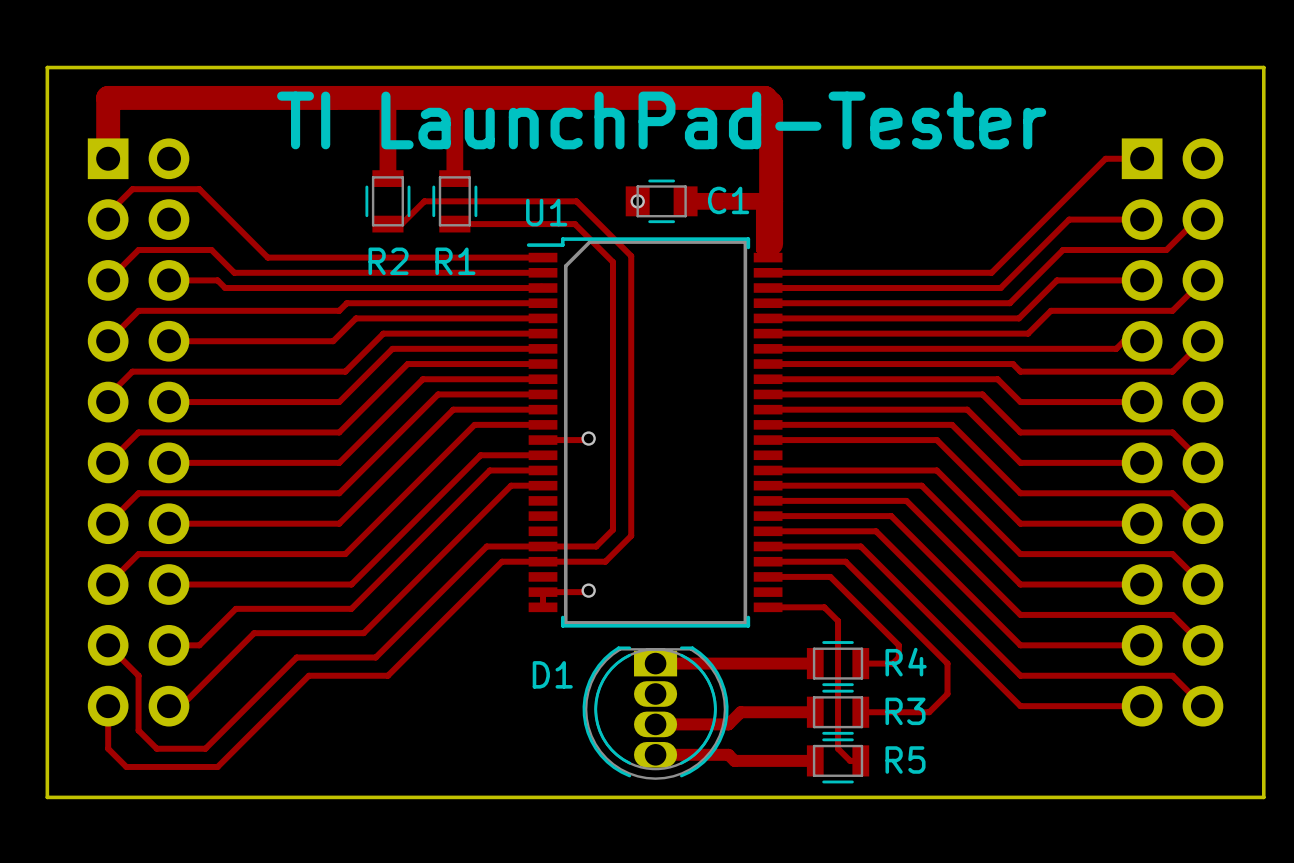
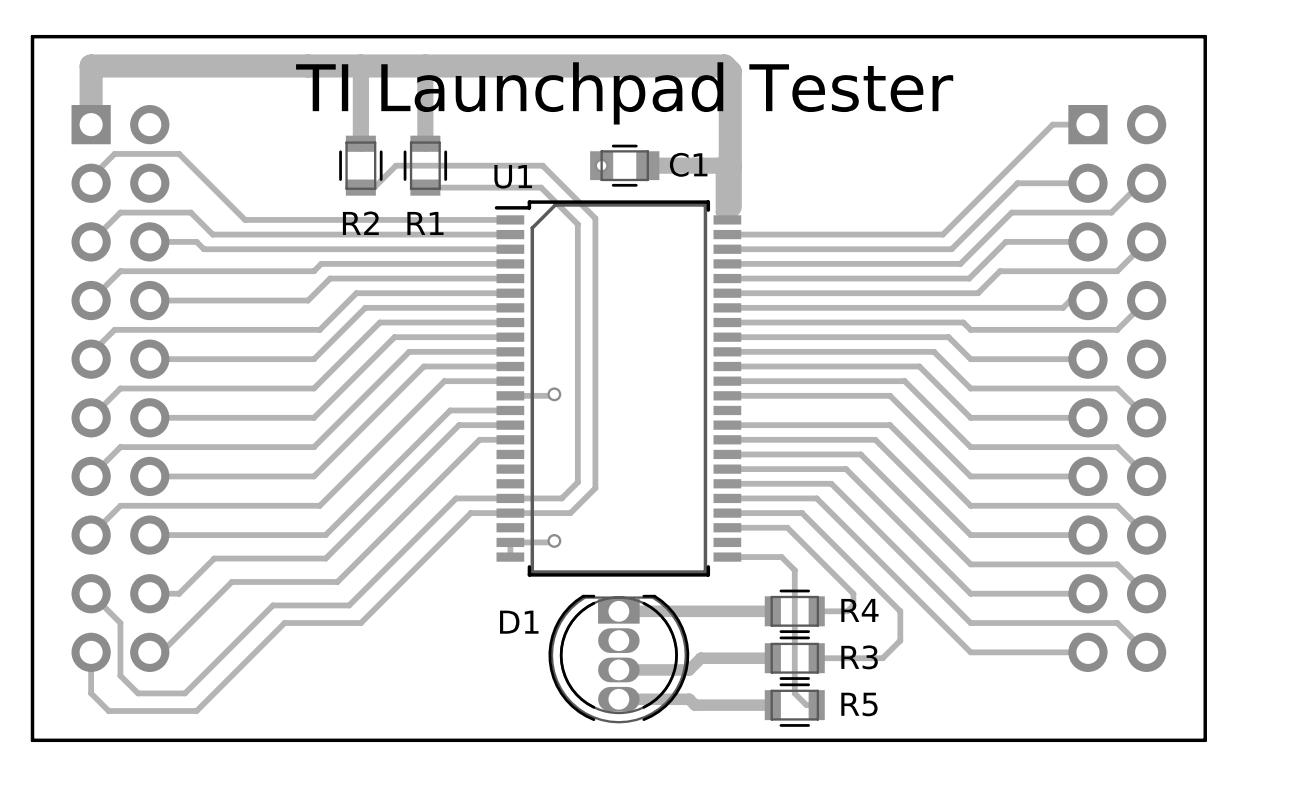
text: TI LaunchPad-Tester (661, 120) -> TI Launchpad Tester (624, 93)

